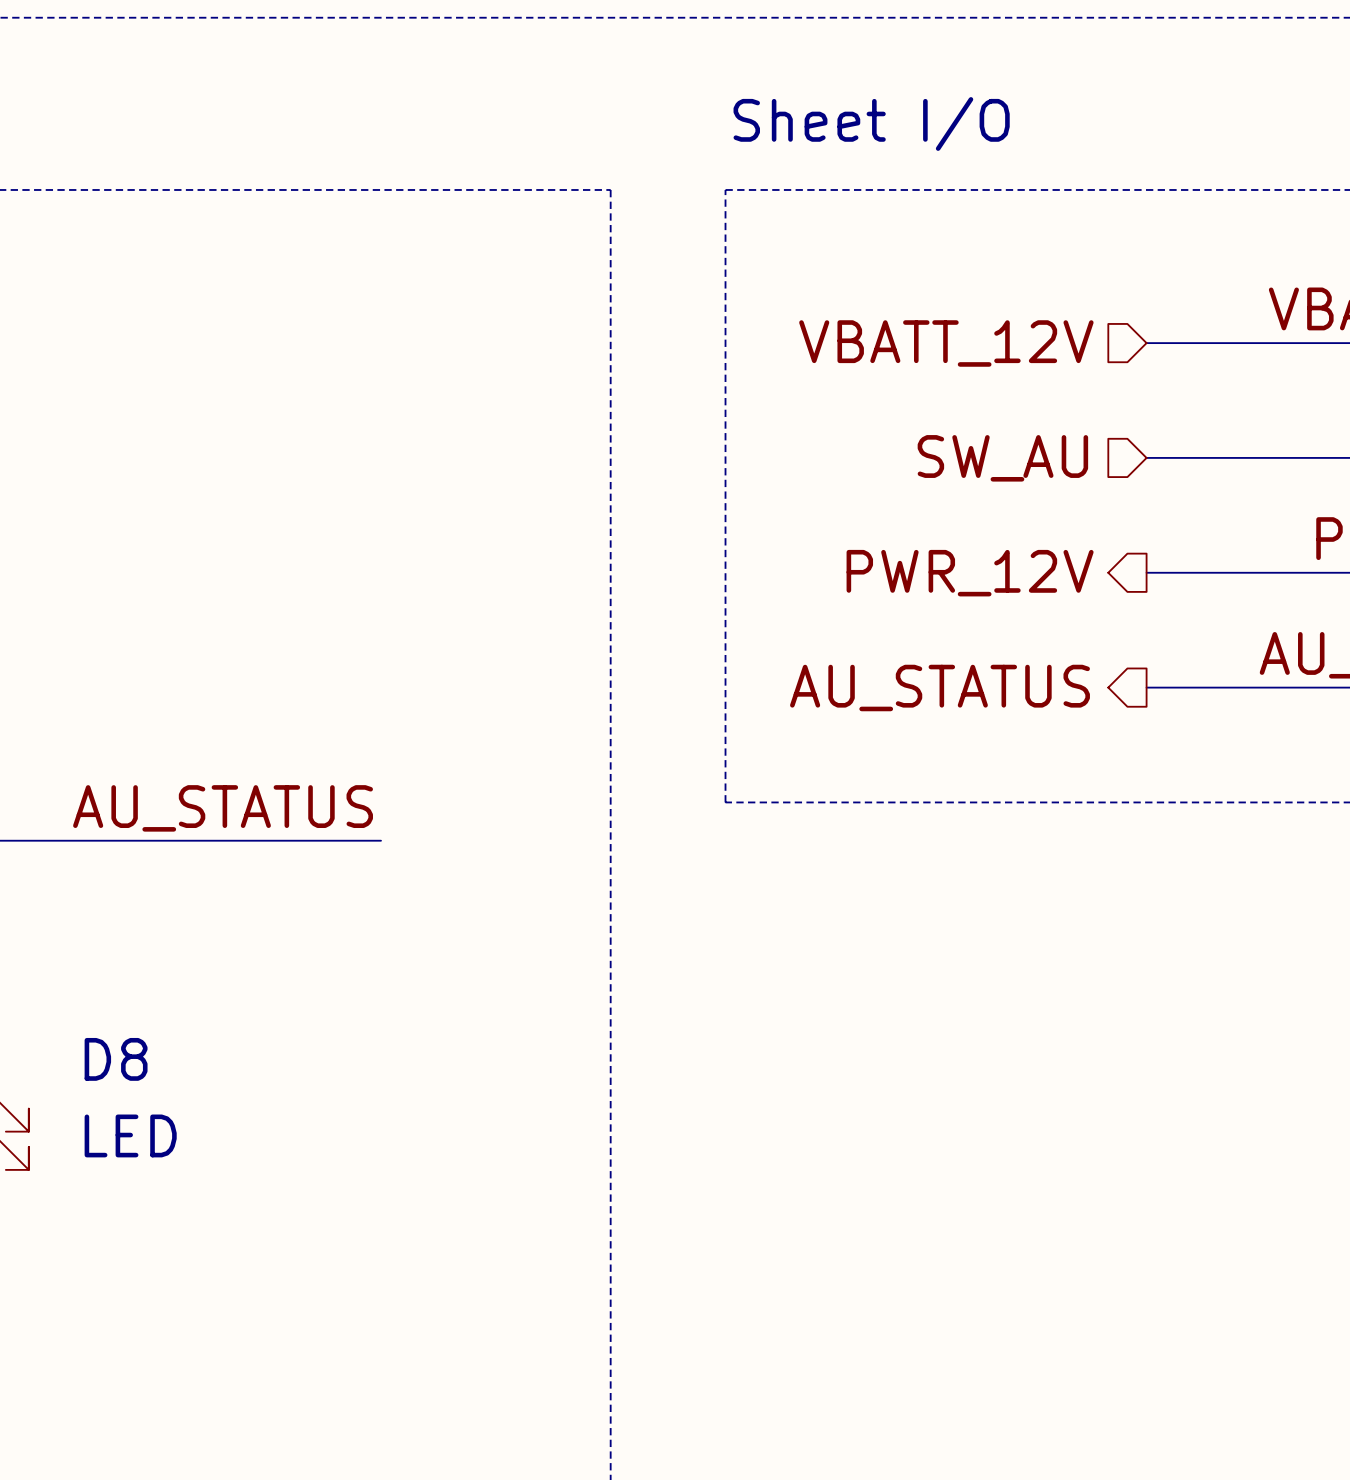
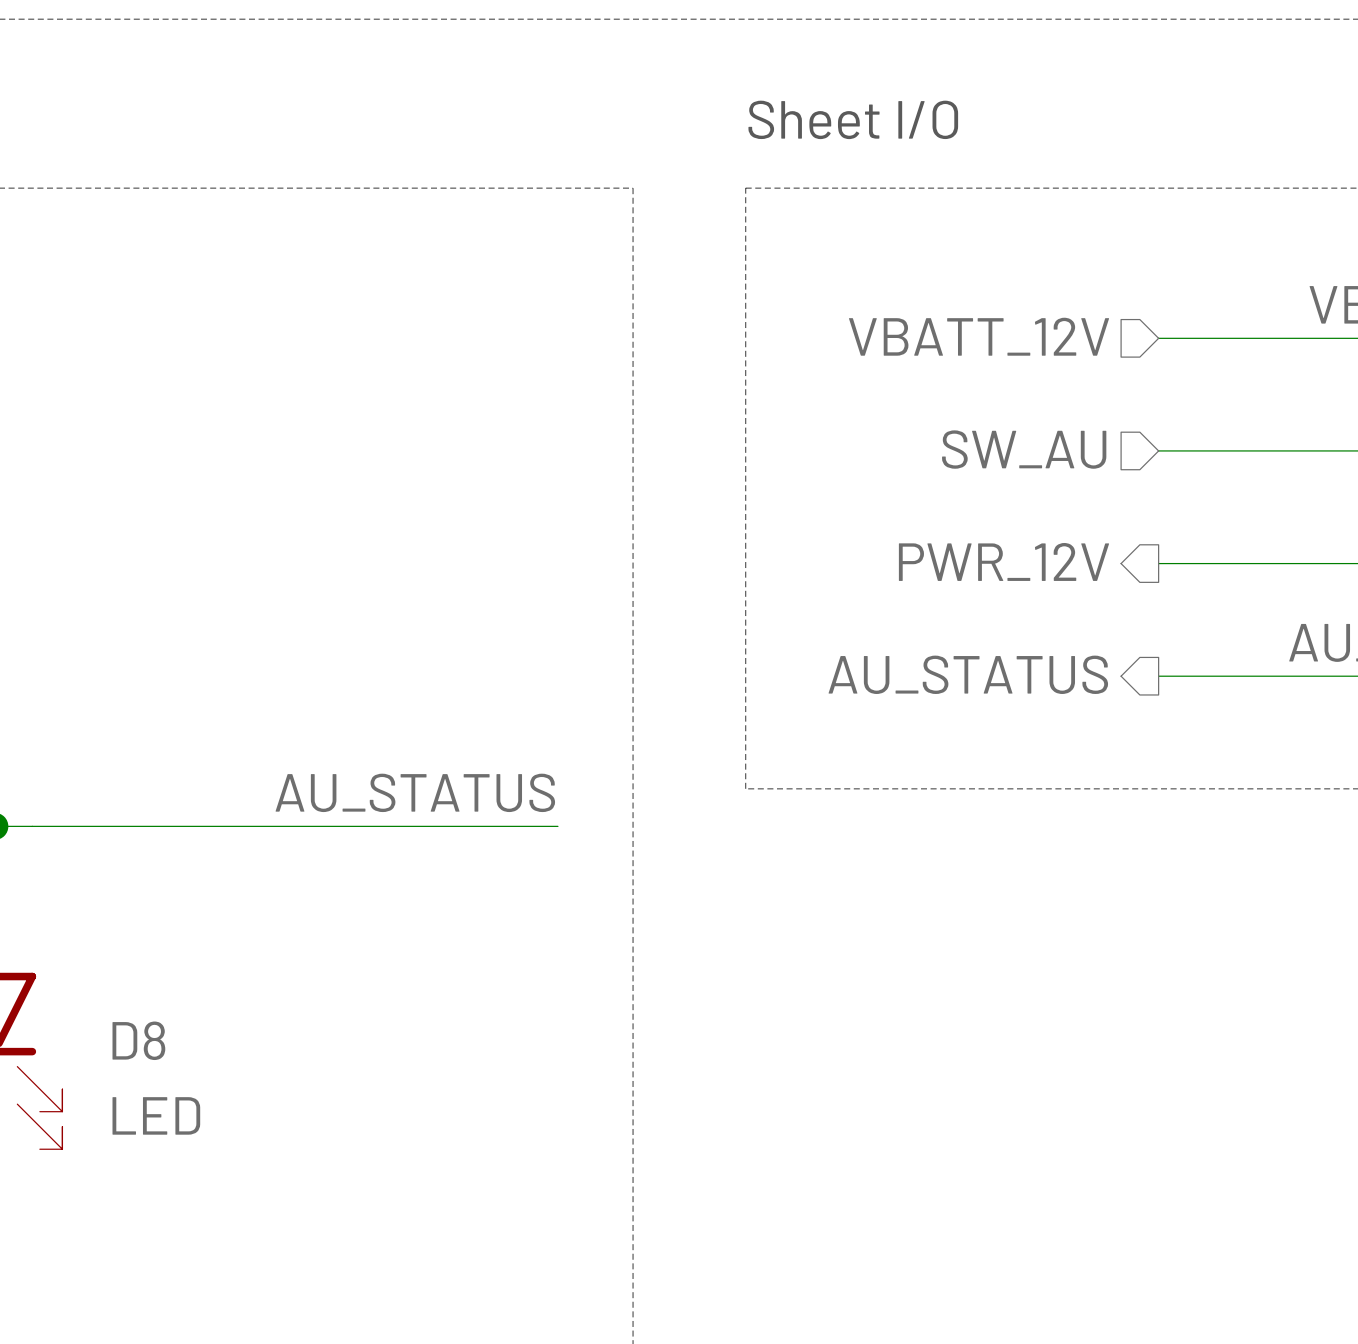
label position: AU_STATUS (223, 808) -> AU_STATUS (415, 792)
wire: none -> (407, 826) (557, 826)

